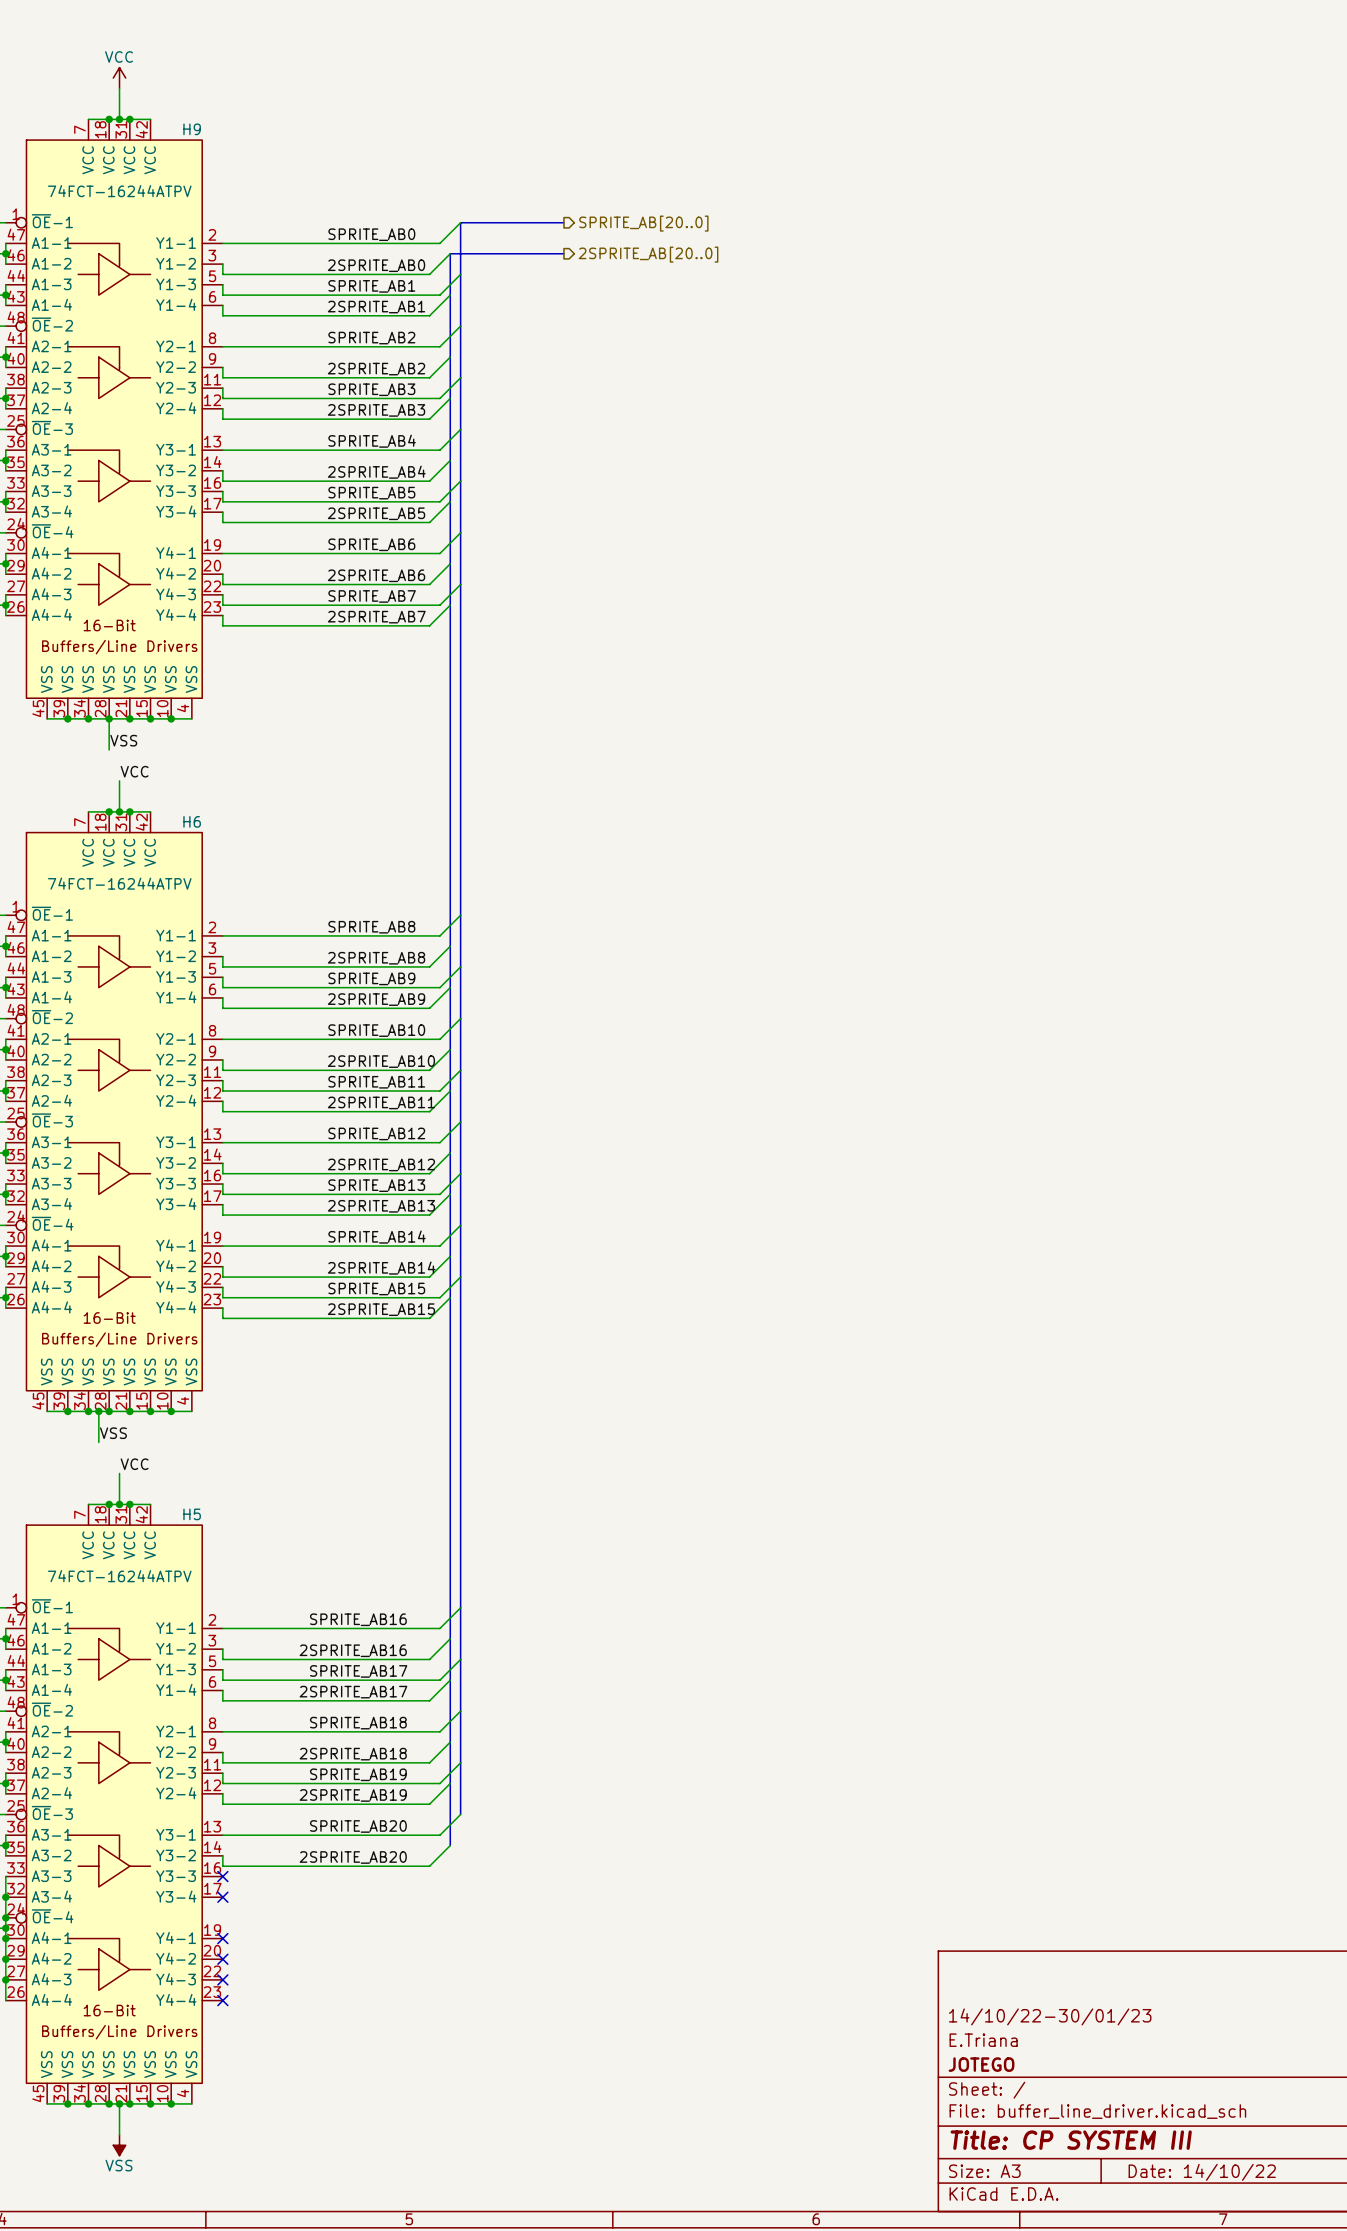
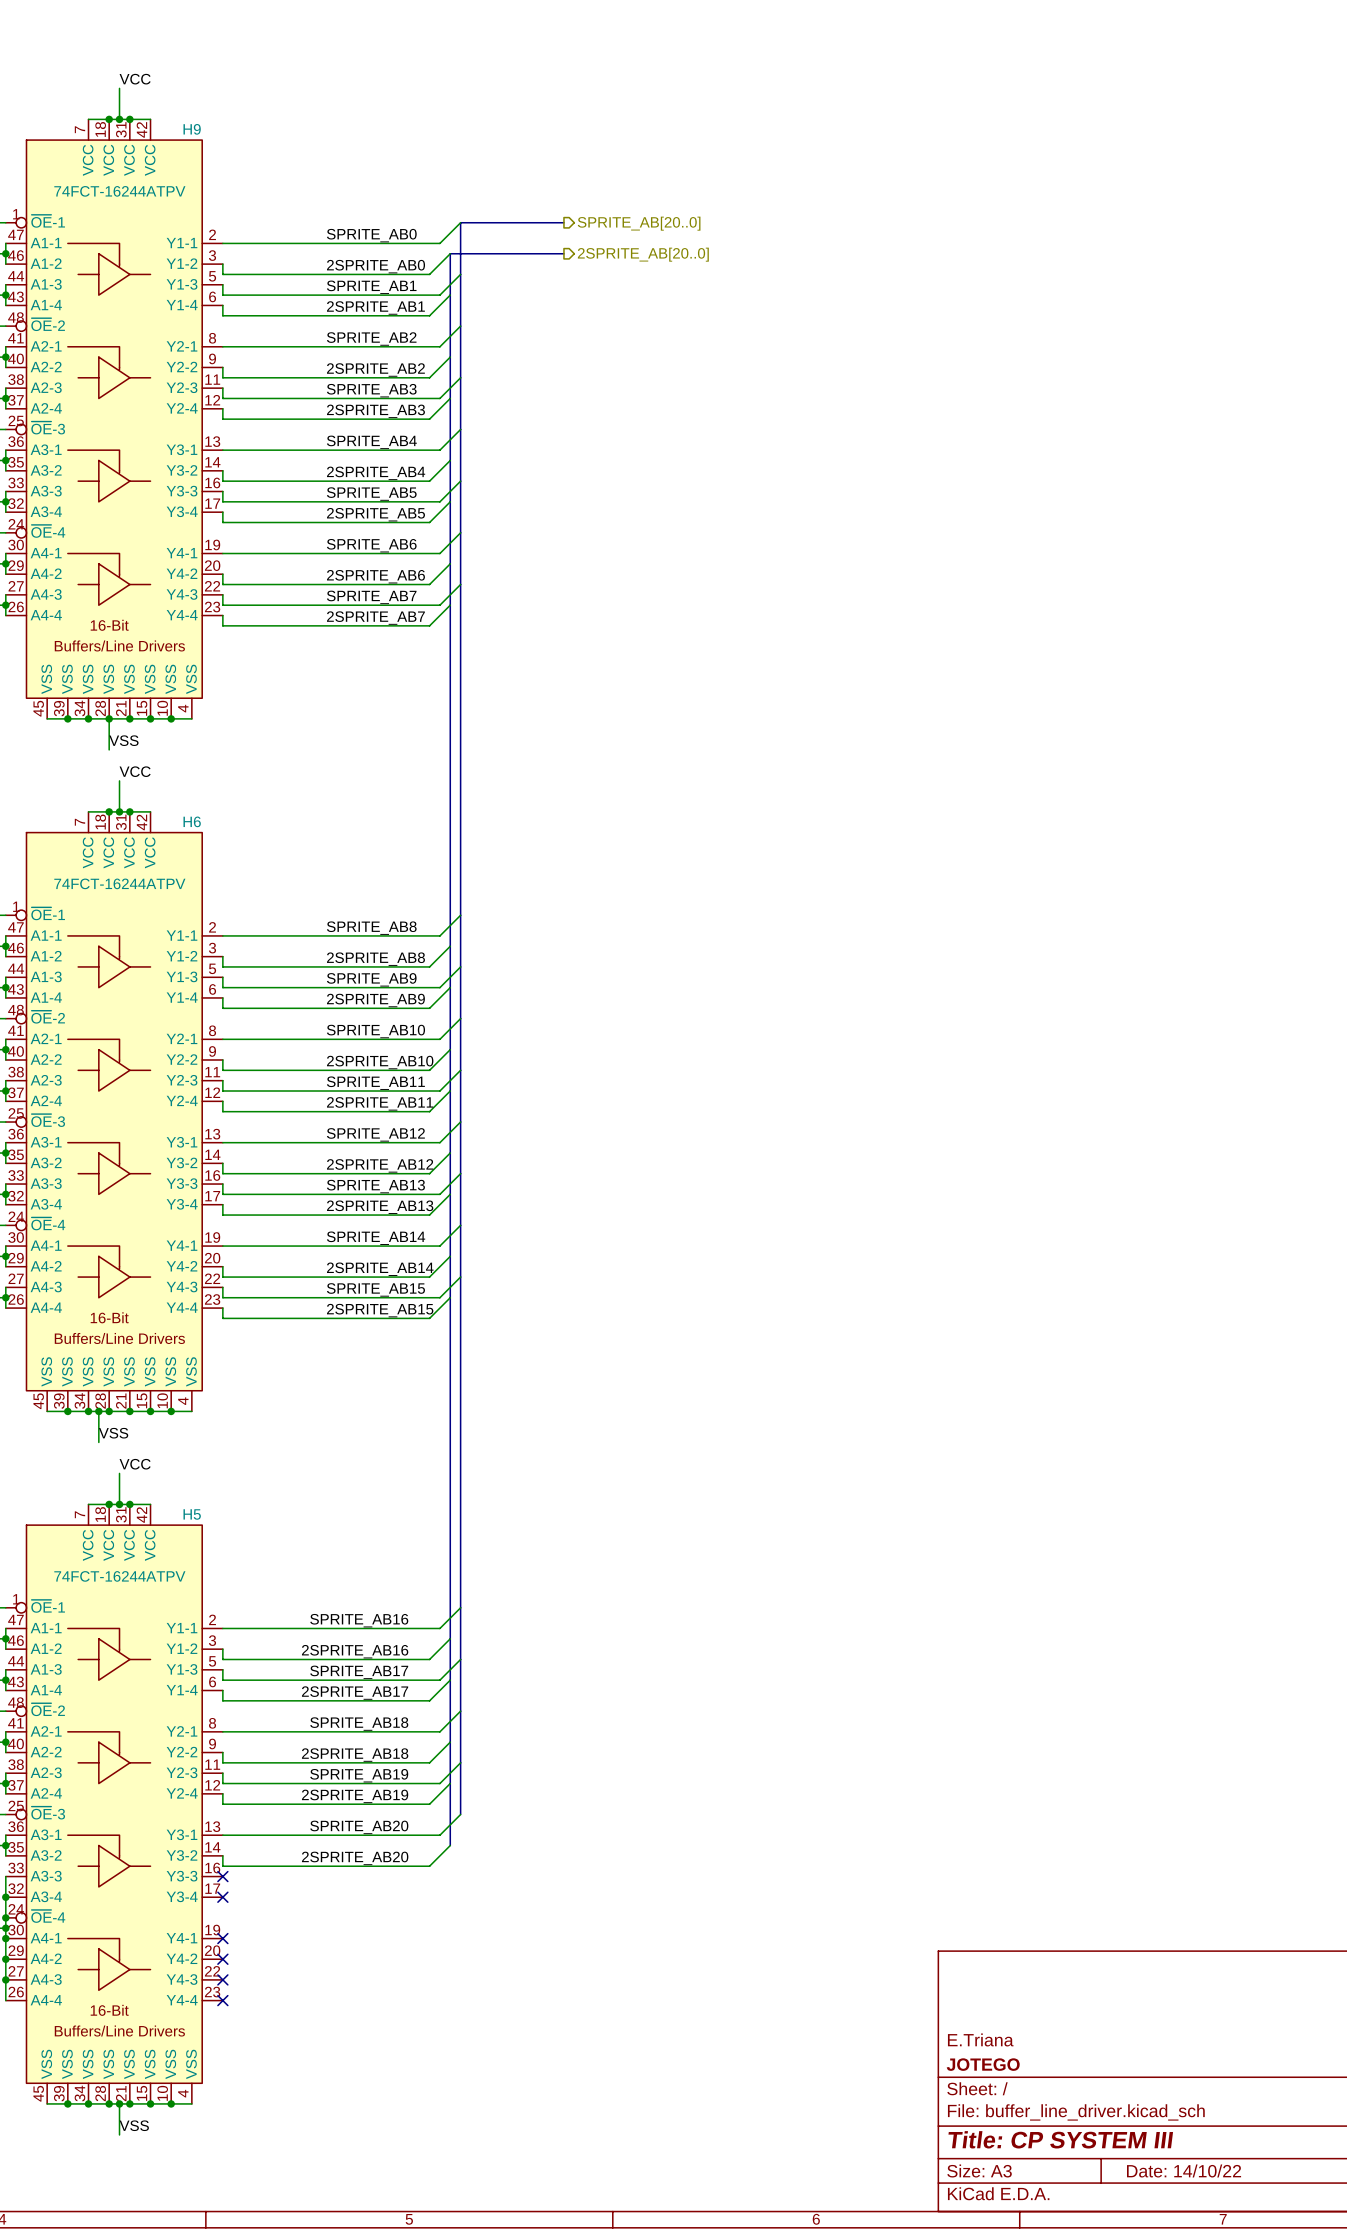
power symbol: VCC (119, 78) -> none
label: none -> VCC (135, 79)
title block: 14/10/22-30/01/23 (1050, 2016) -> none
label: none -> VSS (134, 2125)
power symbol: VSS (119, 2145) -> none

